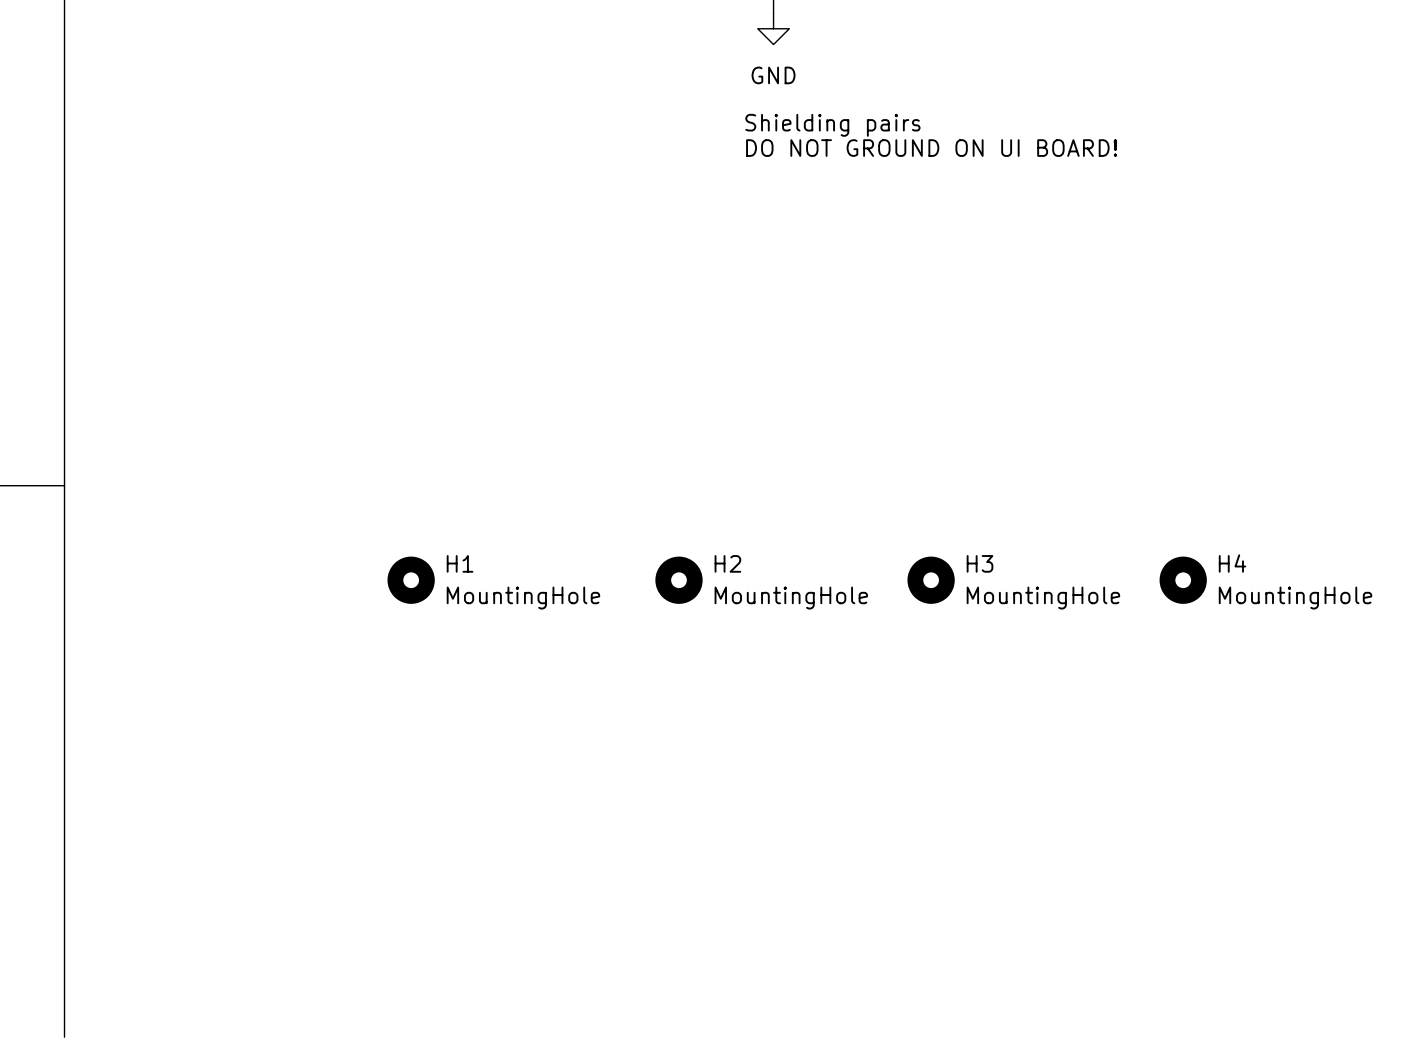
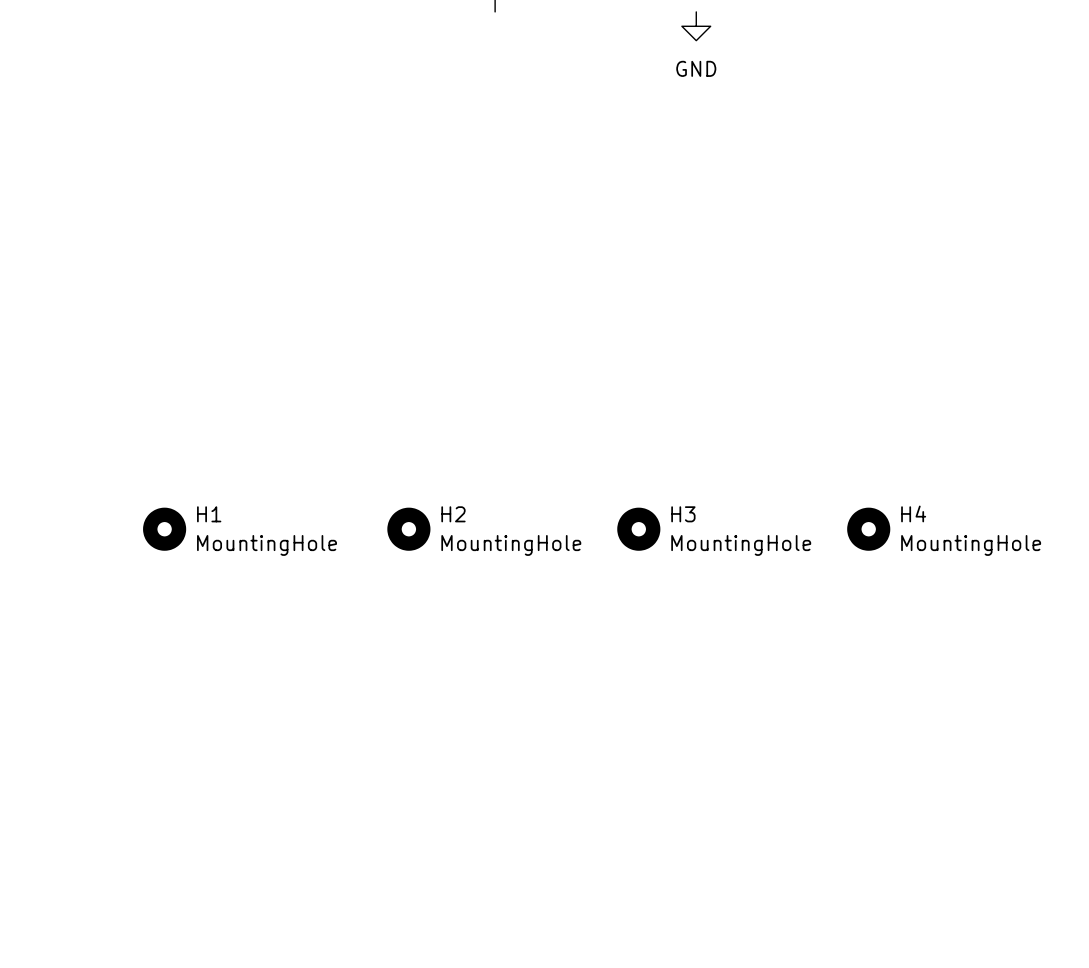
power symbol position: GND (773, 28) -> GND (696, 26)
text: Shielding pairs (832, 125) -> none
text: DO NOT GROUND ON UI BOARD! (931, 148) -> none

